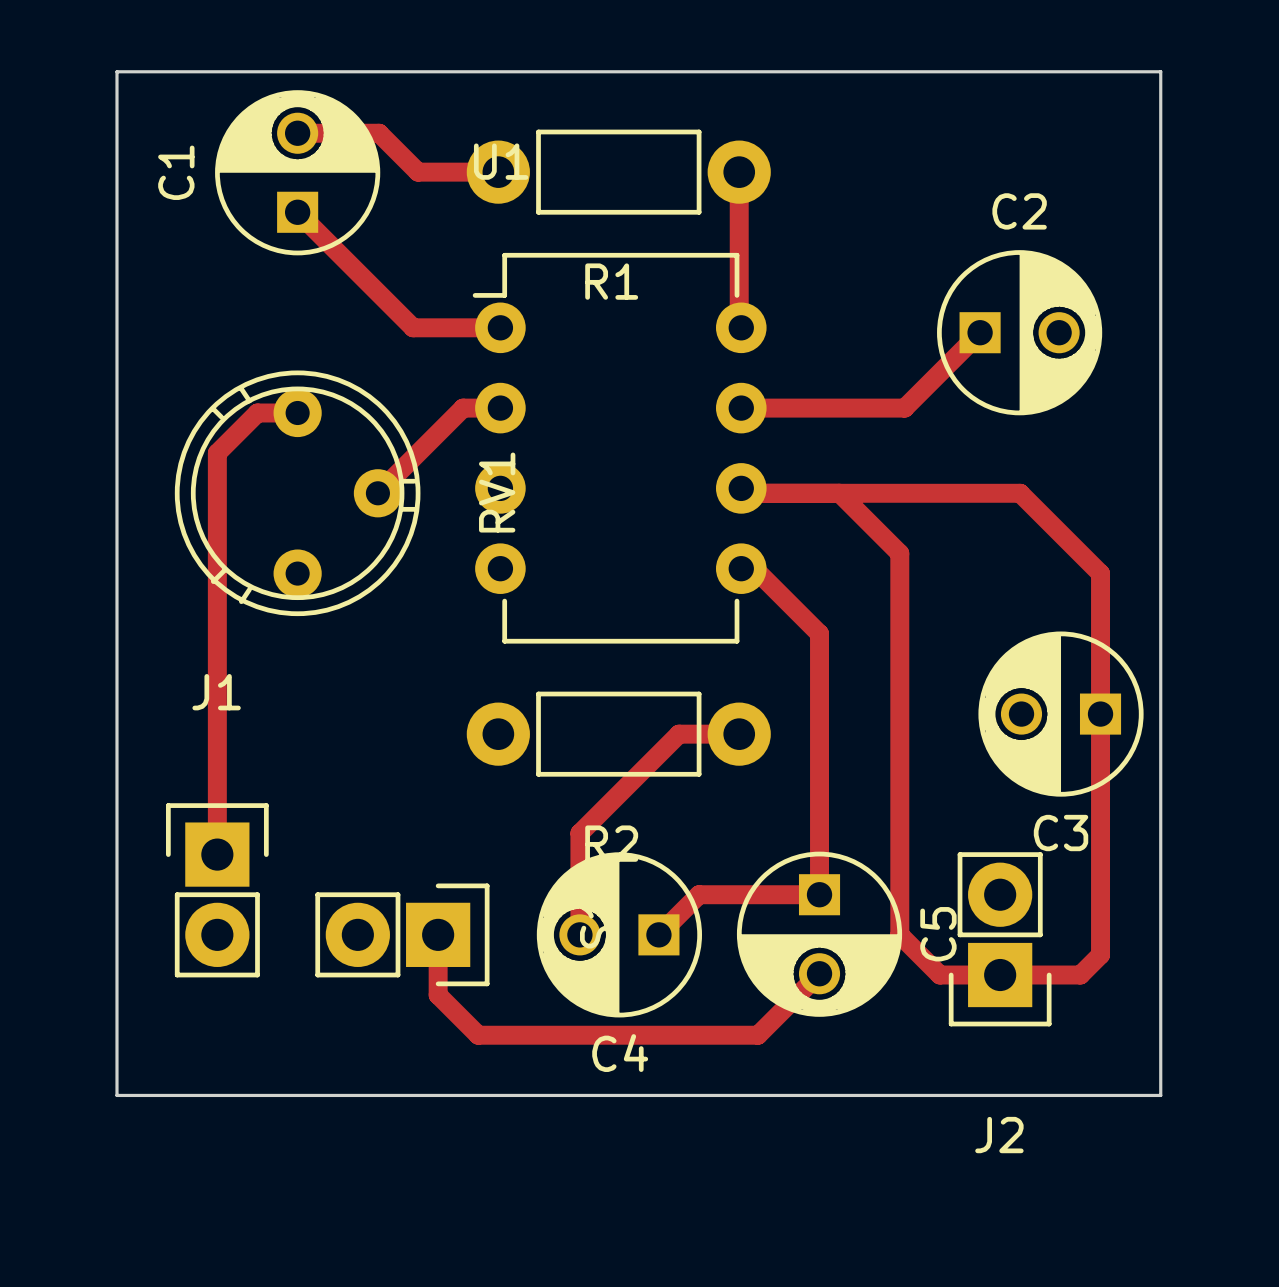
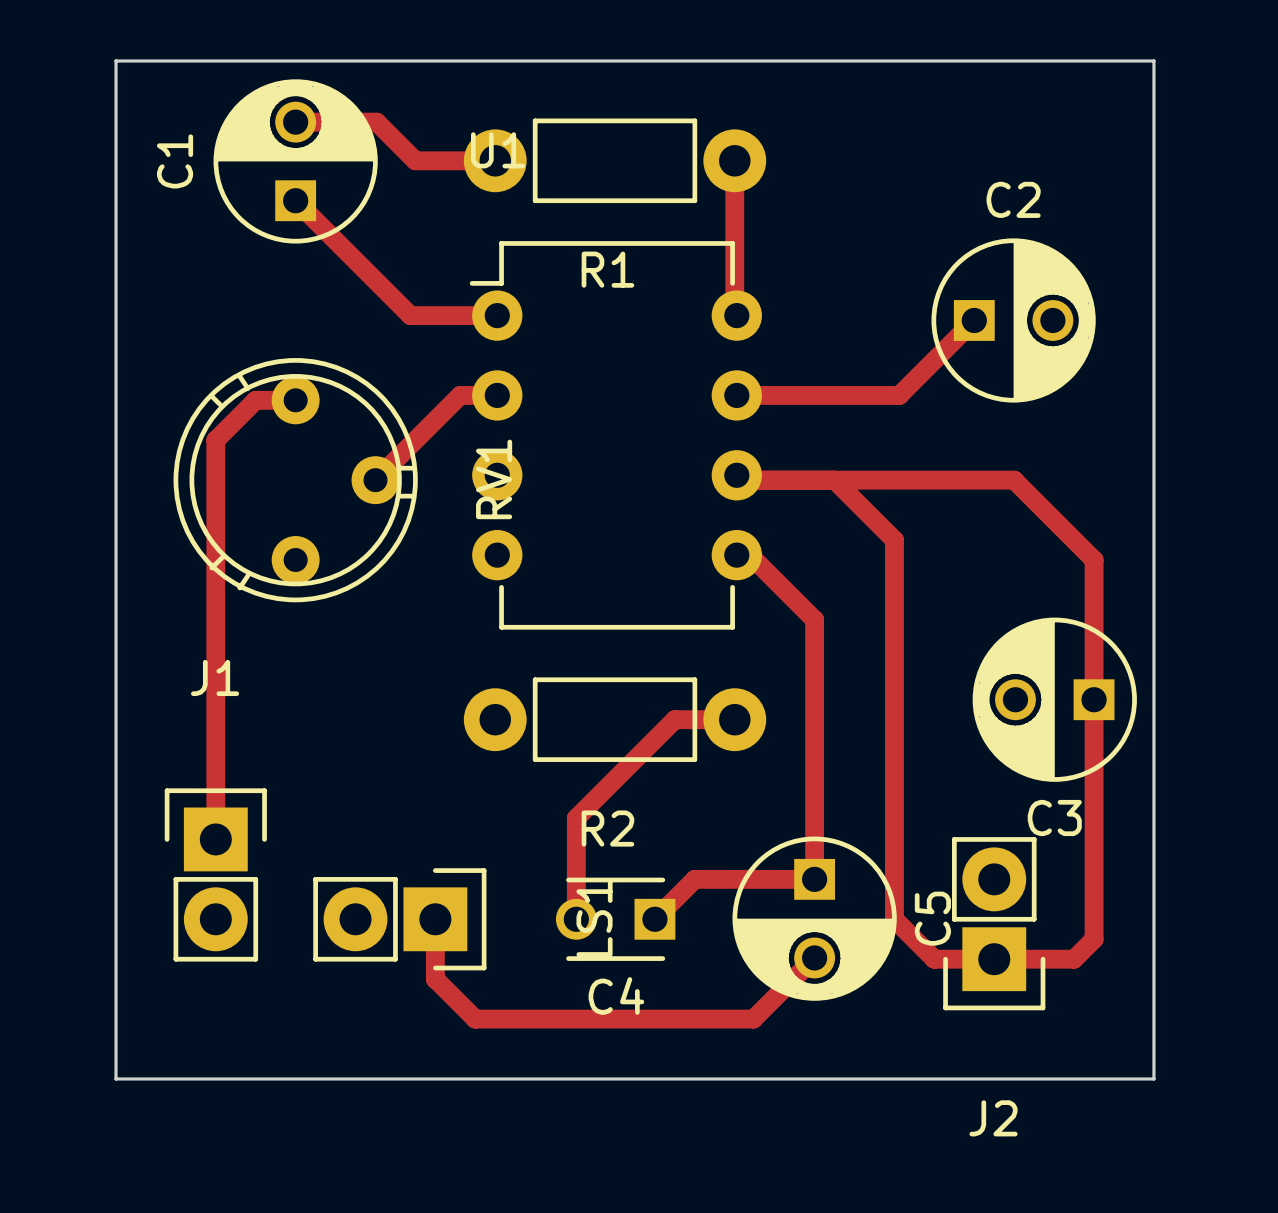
C4 footprint: [536, 852, 703, 1018] -> [555, 877, 676, 961]

